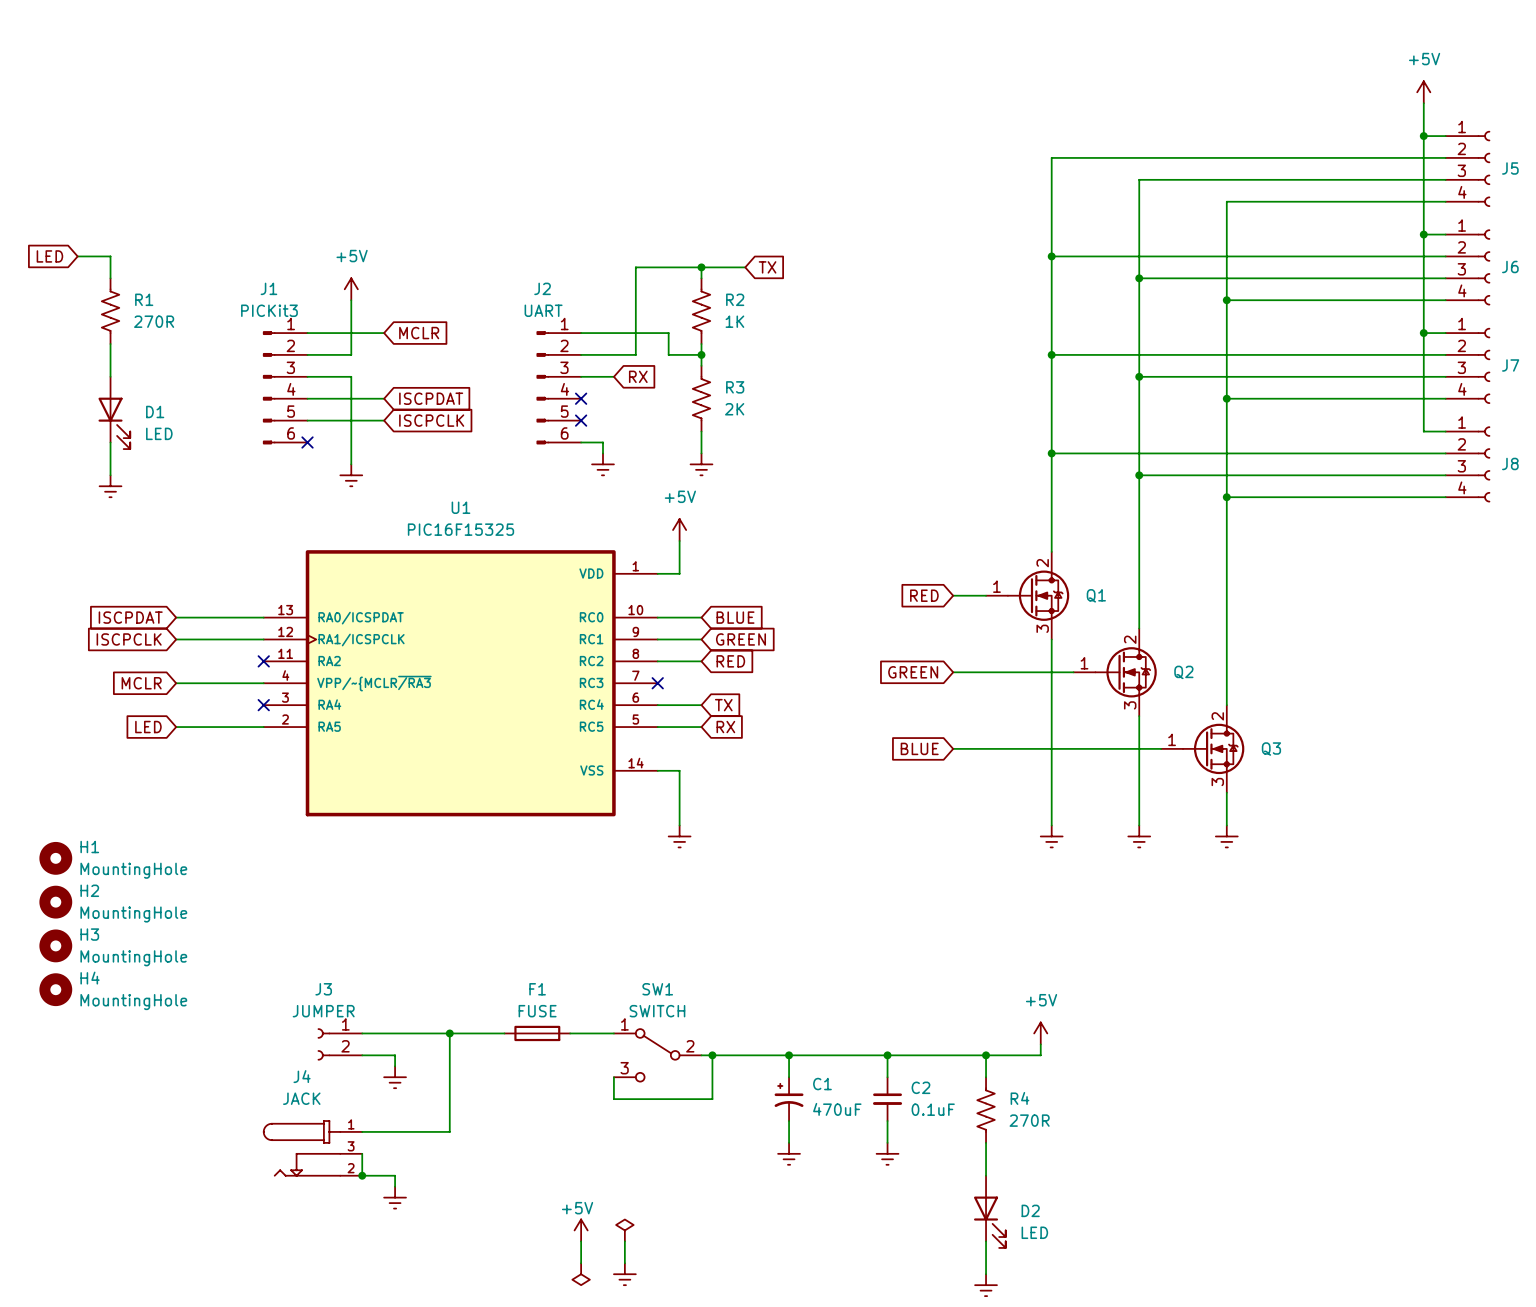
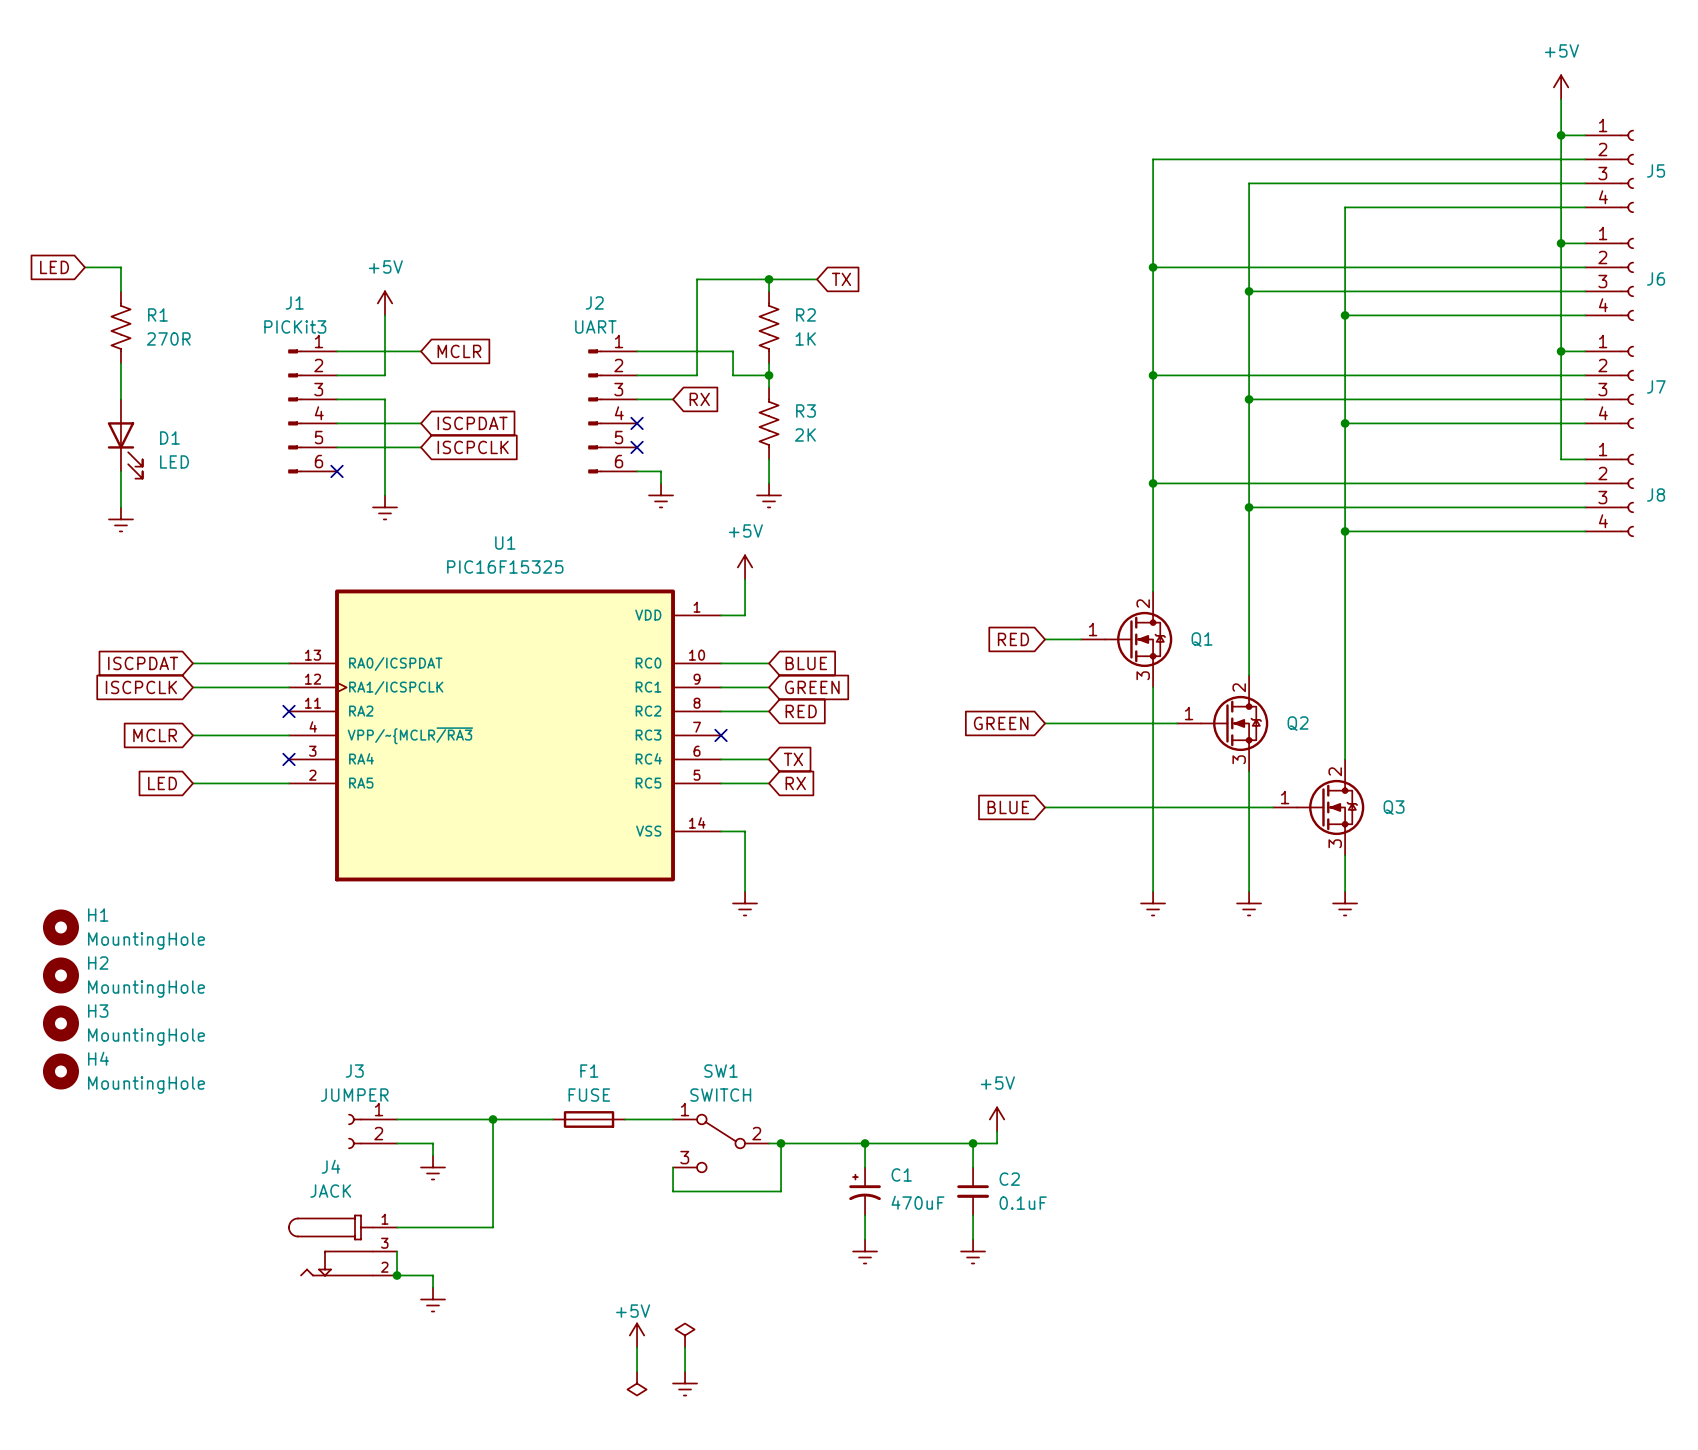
power symbol position: +5V (1040, 1033) -> +5V (997, 1119)
wire: (1040, 1044) (1040, 1055) (909, 1055) -> (997, 1131) (997, 1143)
wire: (986, 1055) (986, 1077) -> none
junction: (986, 1055) -> none
R4: 270R (986, 1110) -> none
wire: (986, 1142) (986, 1175) -> none
D2: LED (989, 1211) -> none
wire: (986, 1241) (986, 1274) -> none
power symbol: (986, 1285) -> none

